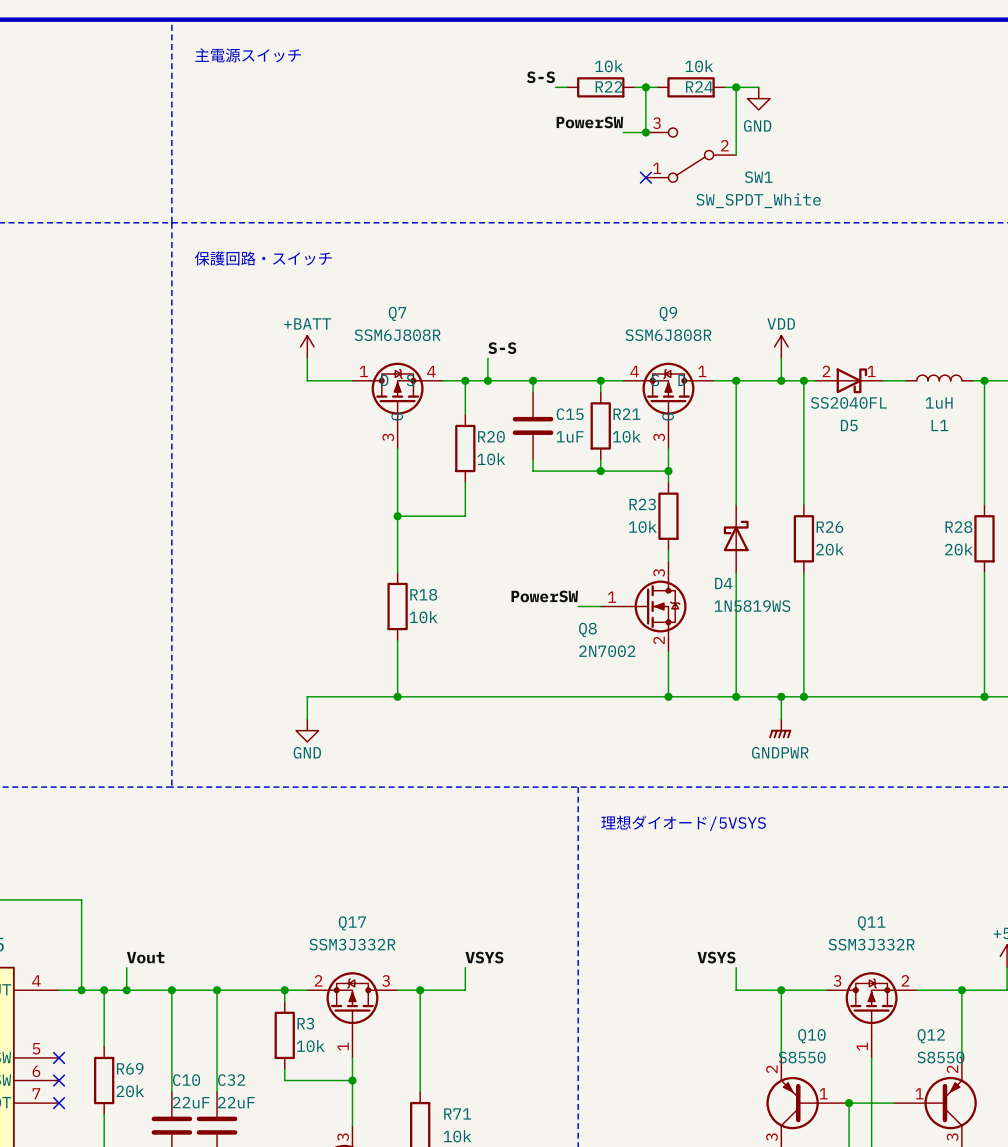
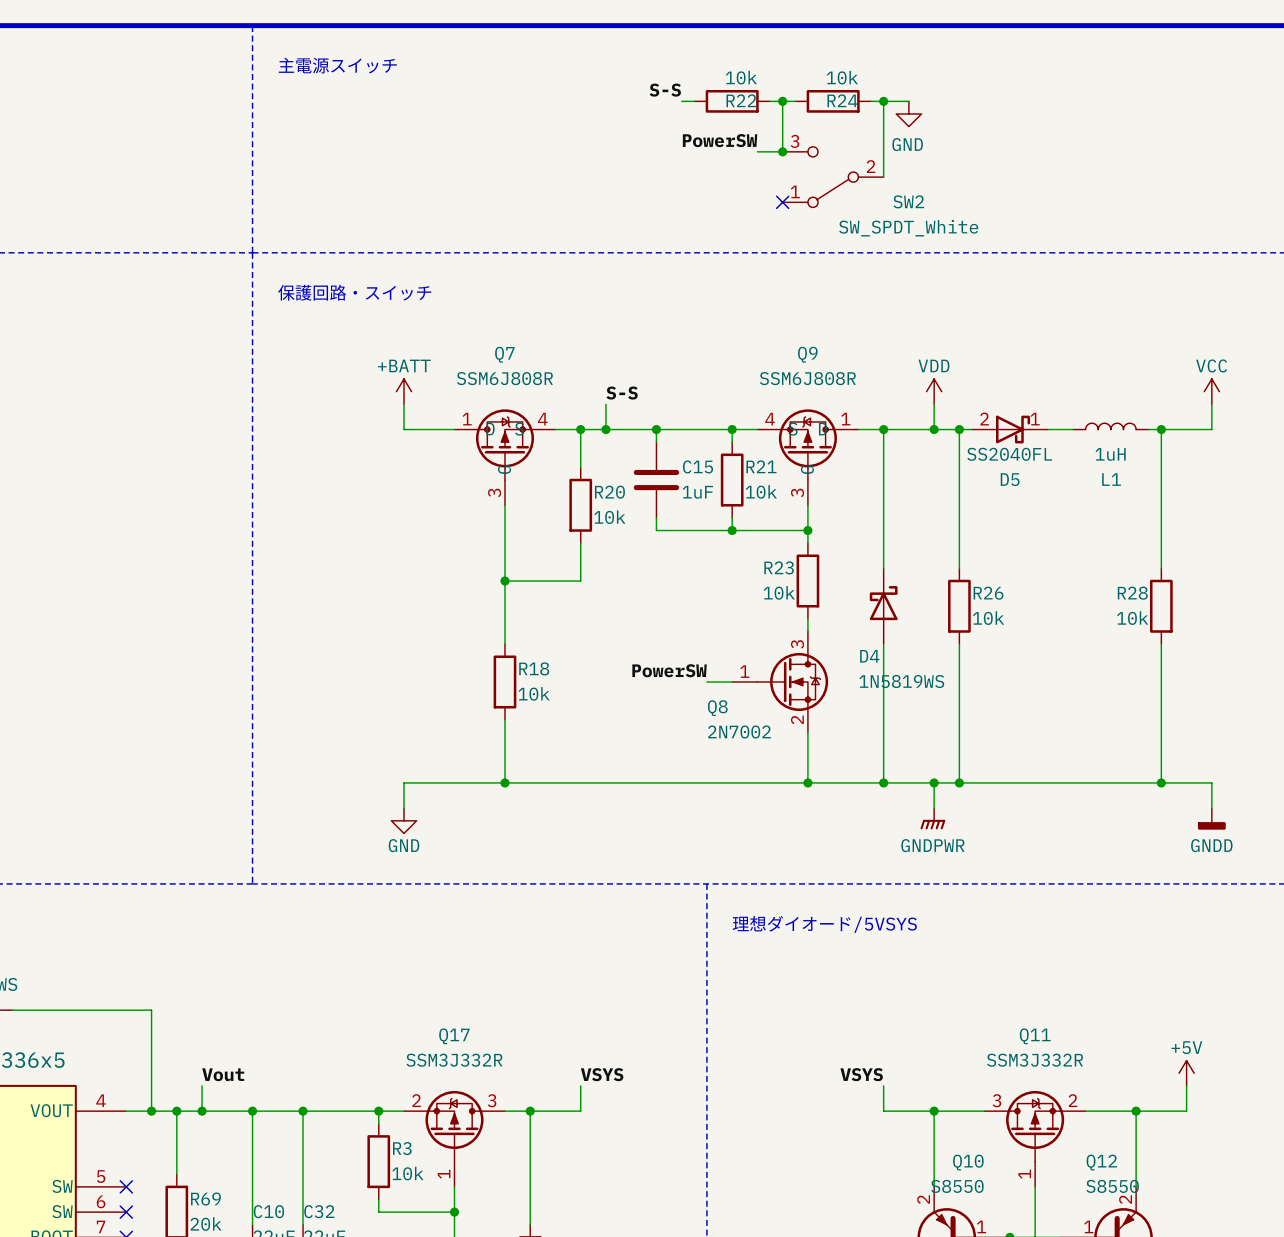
SW1 name: SW1 (758, 177) -> SW2 (908, 201)
R26 value: 20k (830, 549) -> 10k (988, 618)
R28 value: 20k (958, 549) -> 10k (1132, 618)

